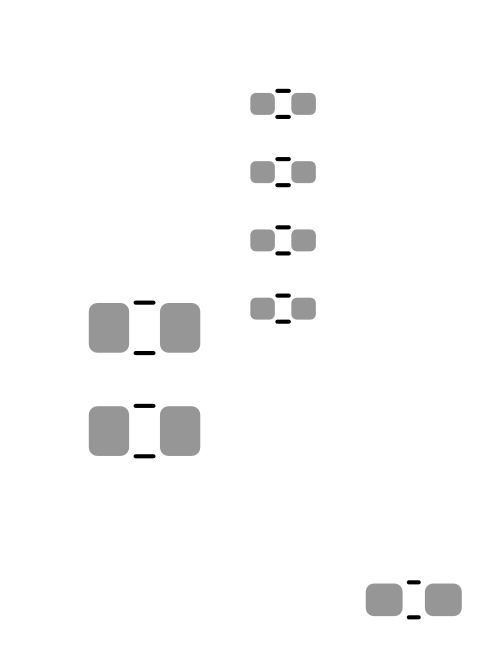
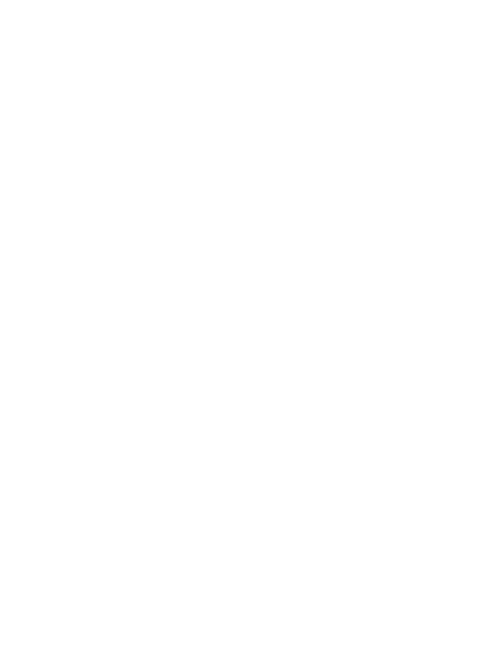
part: (283, 103) -> none
part: (283, 172) -> none
part: (283, 240) -> none
part: (283, 308) -> none
part: (144, 327) -> none
part: (144, 431) -> none
part: (413, 599) -> none

